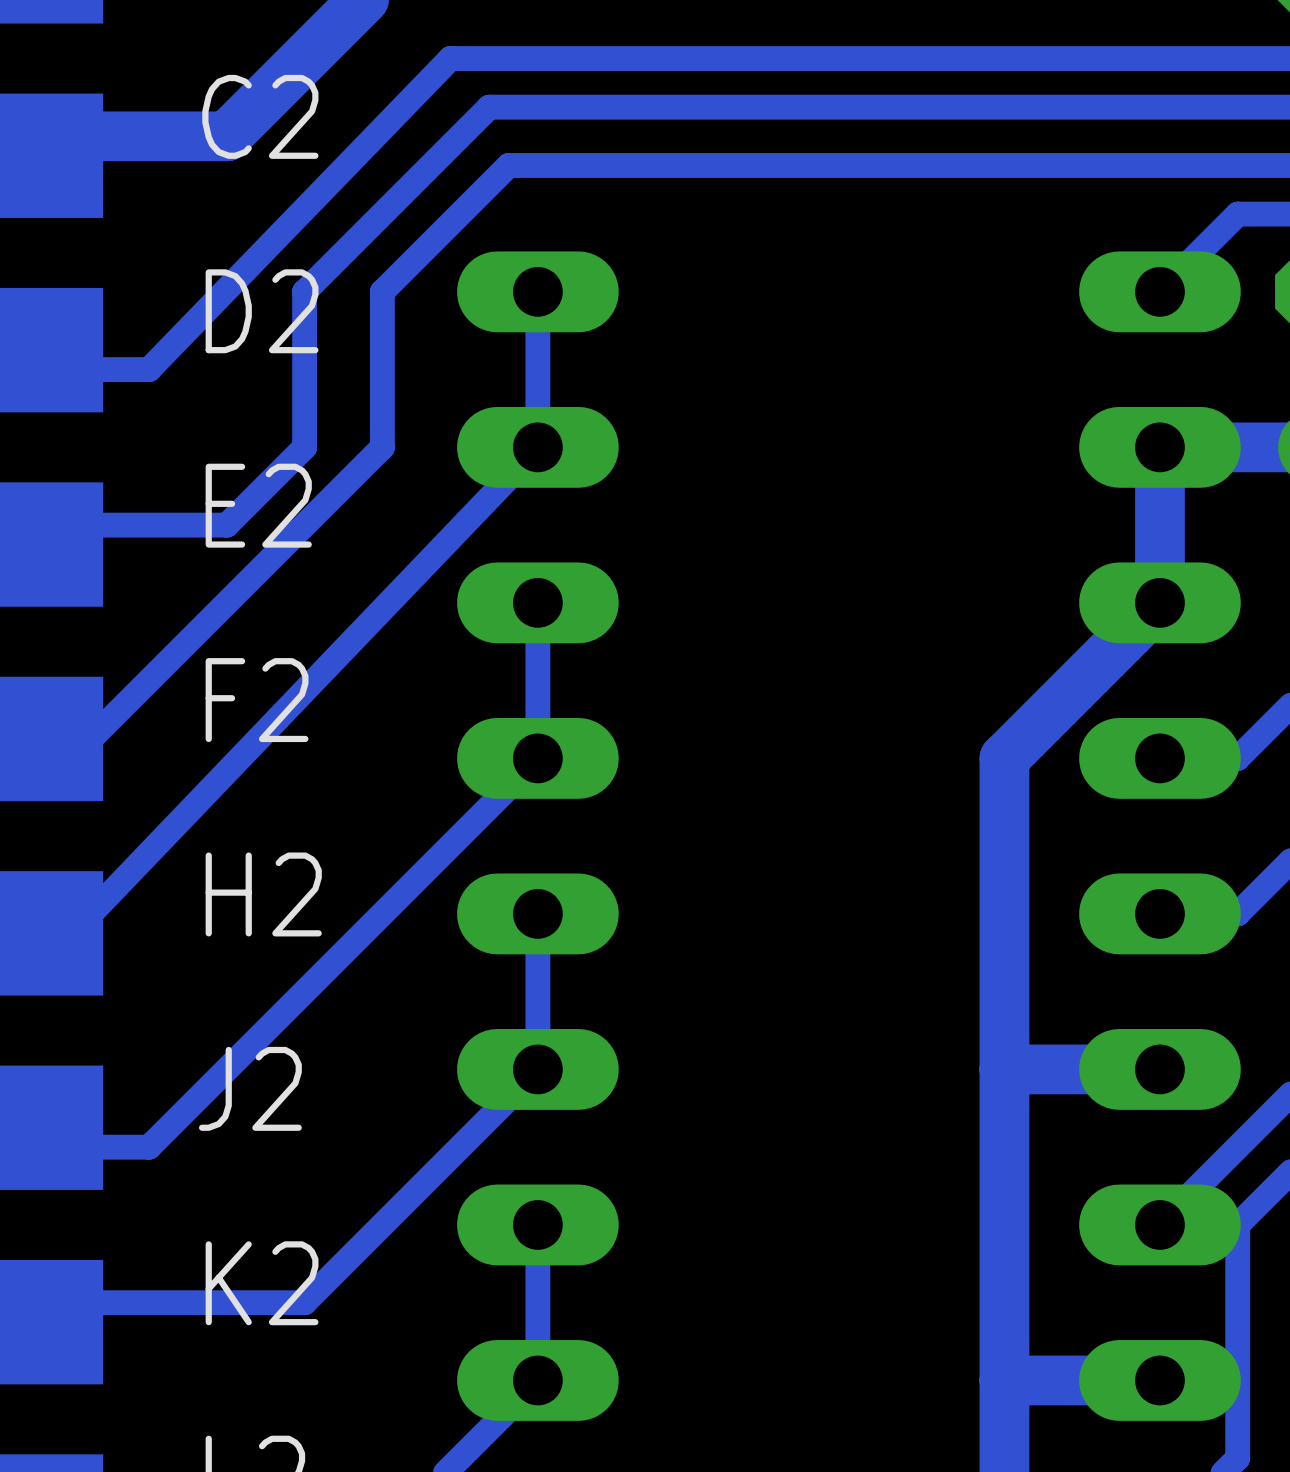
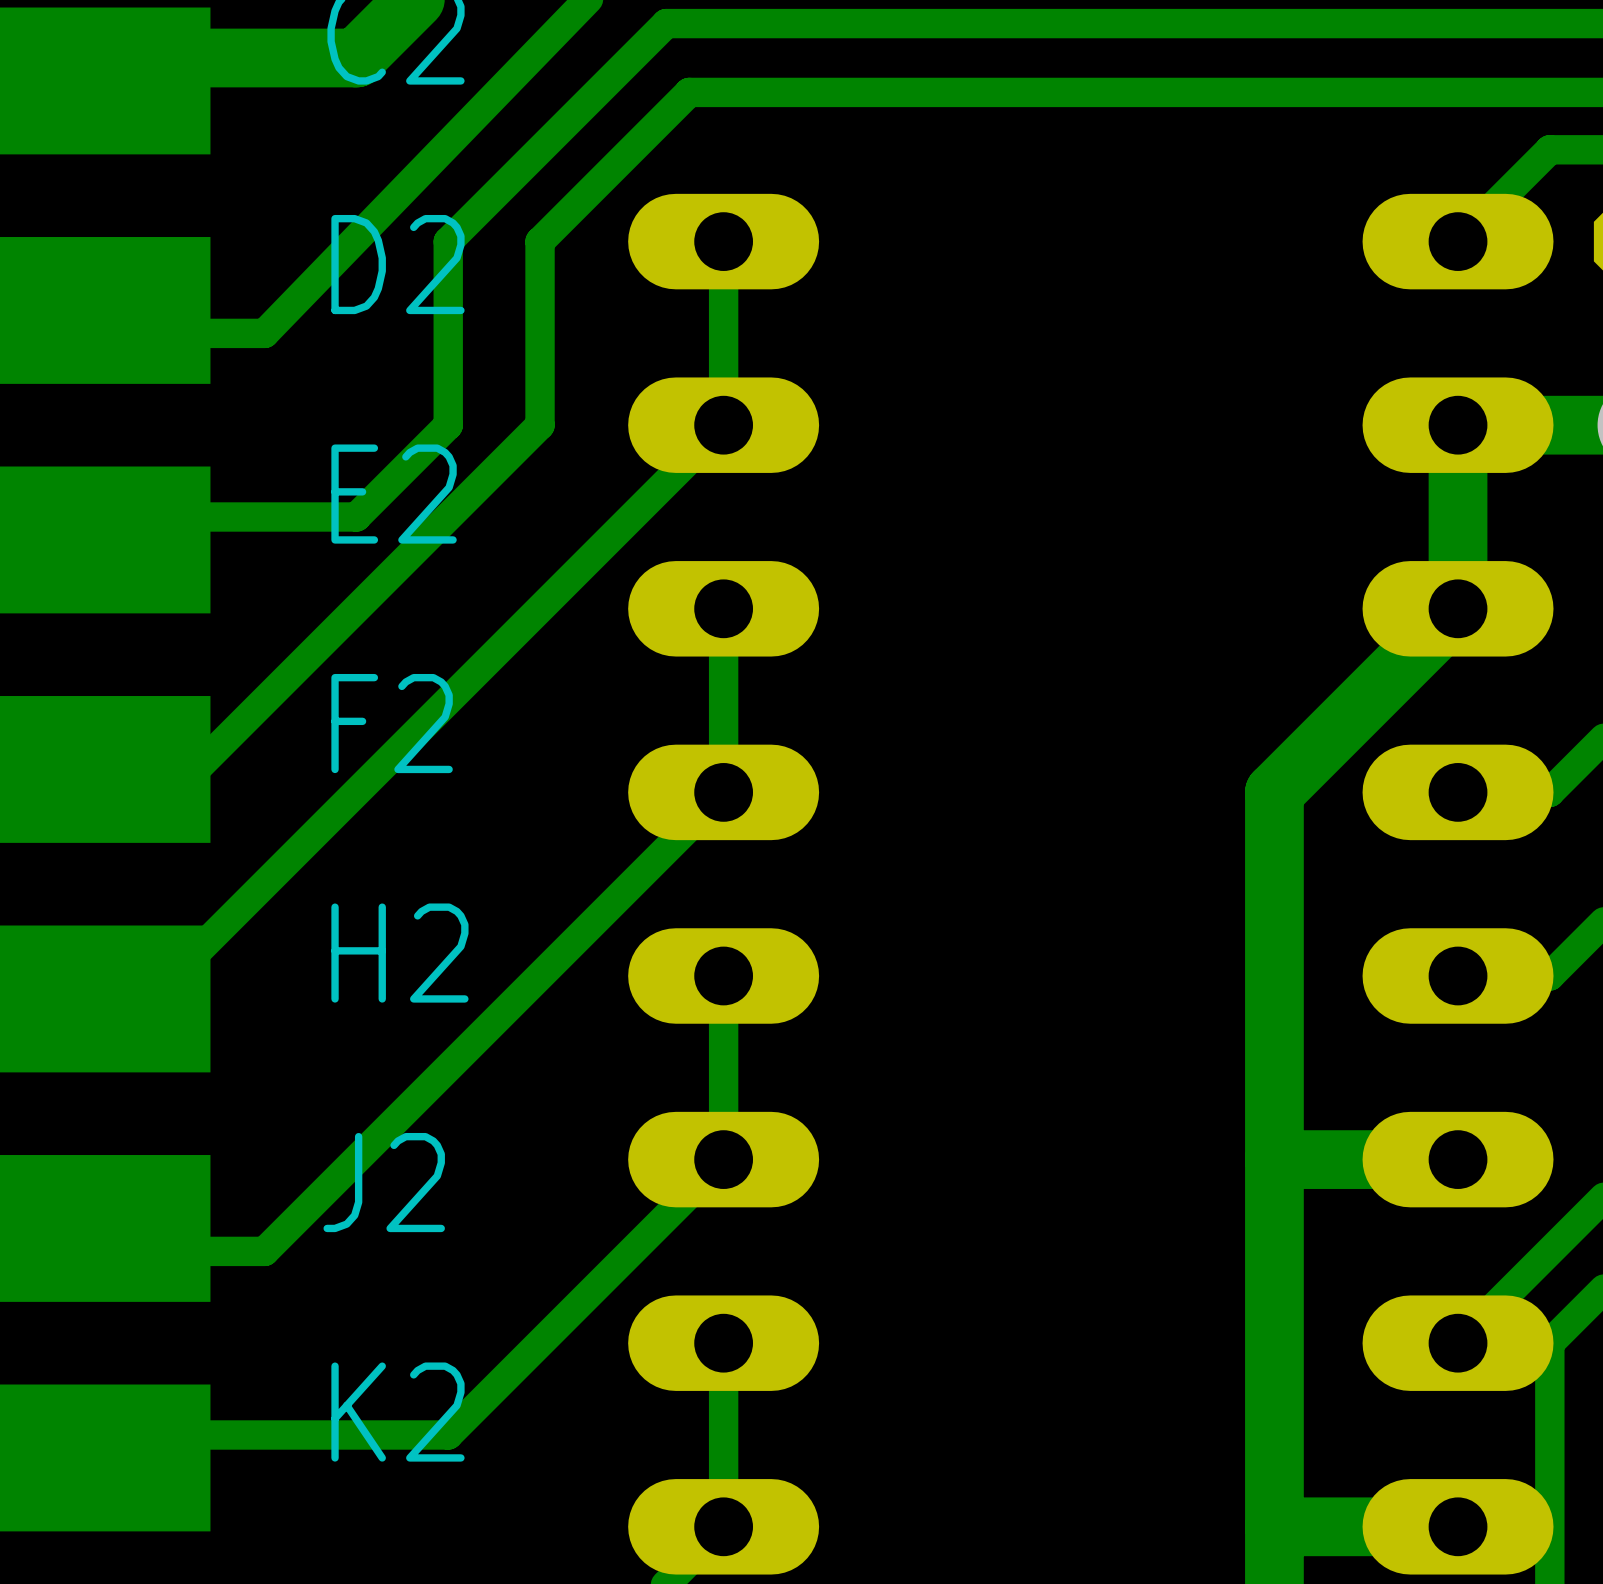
bottom track: (537, 447) (90, 913) (71, 913) -> (723, 425) (172, 975)

